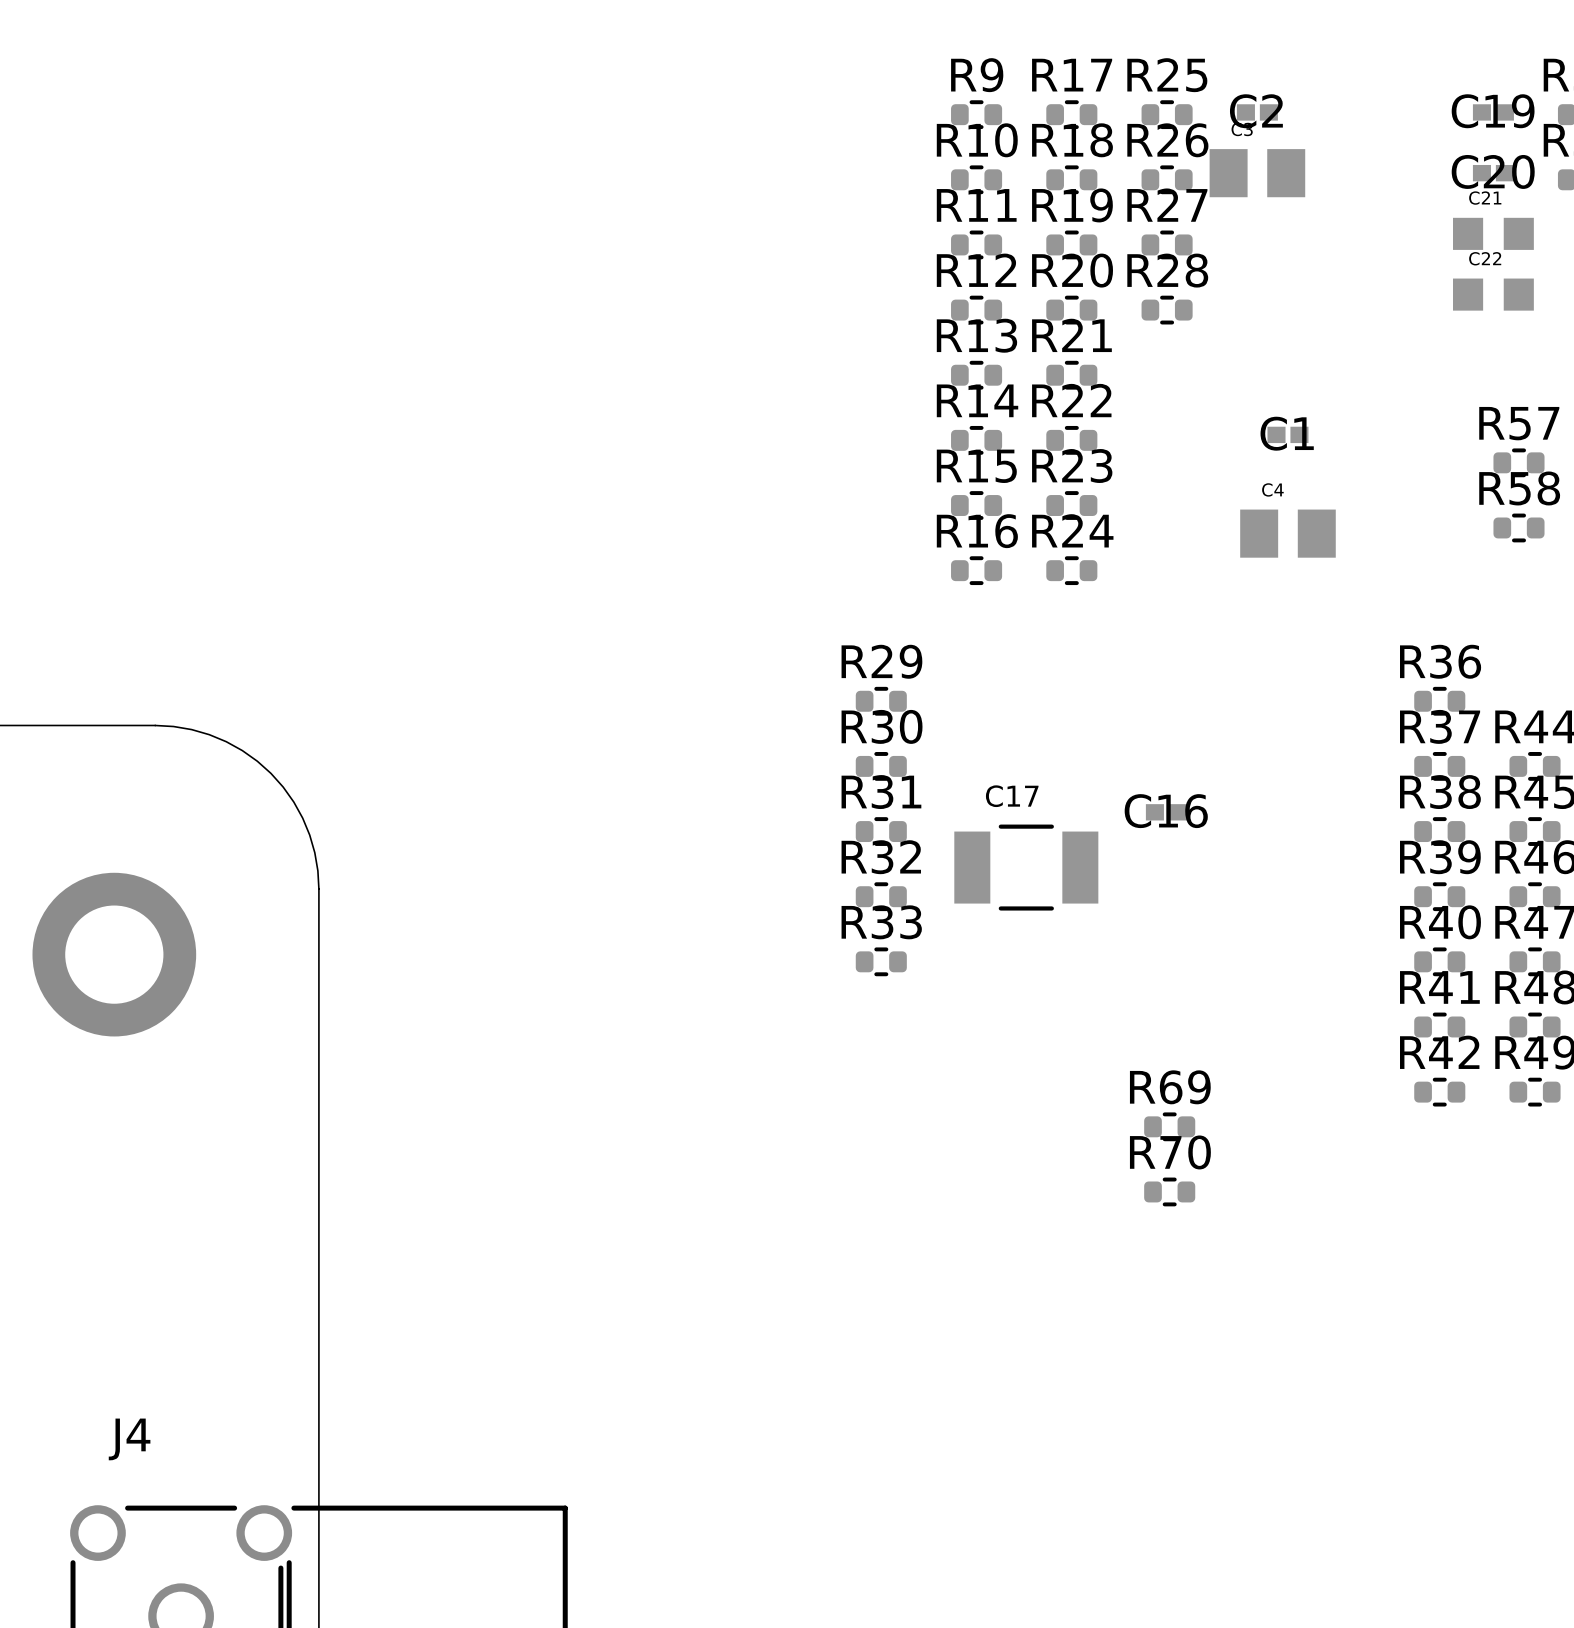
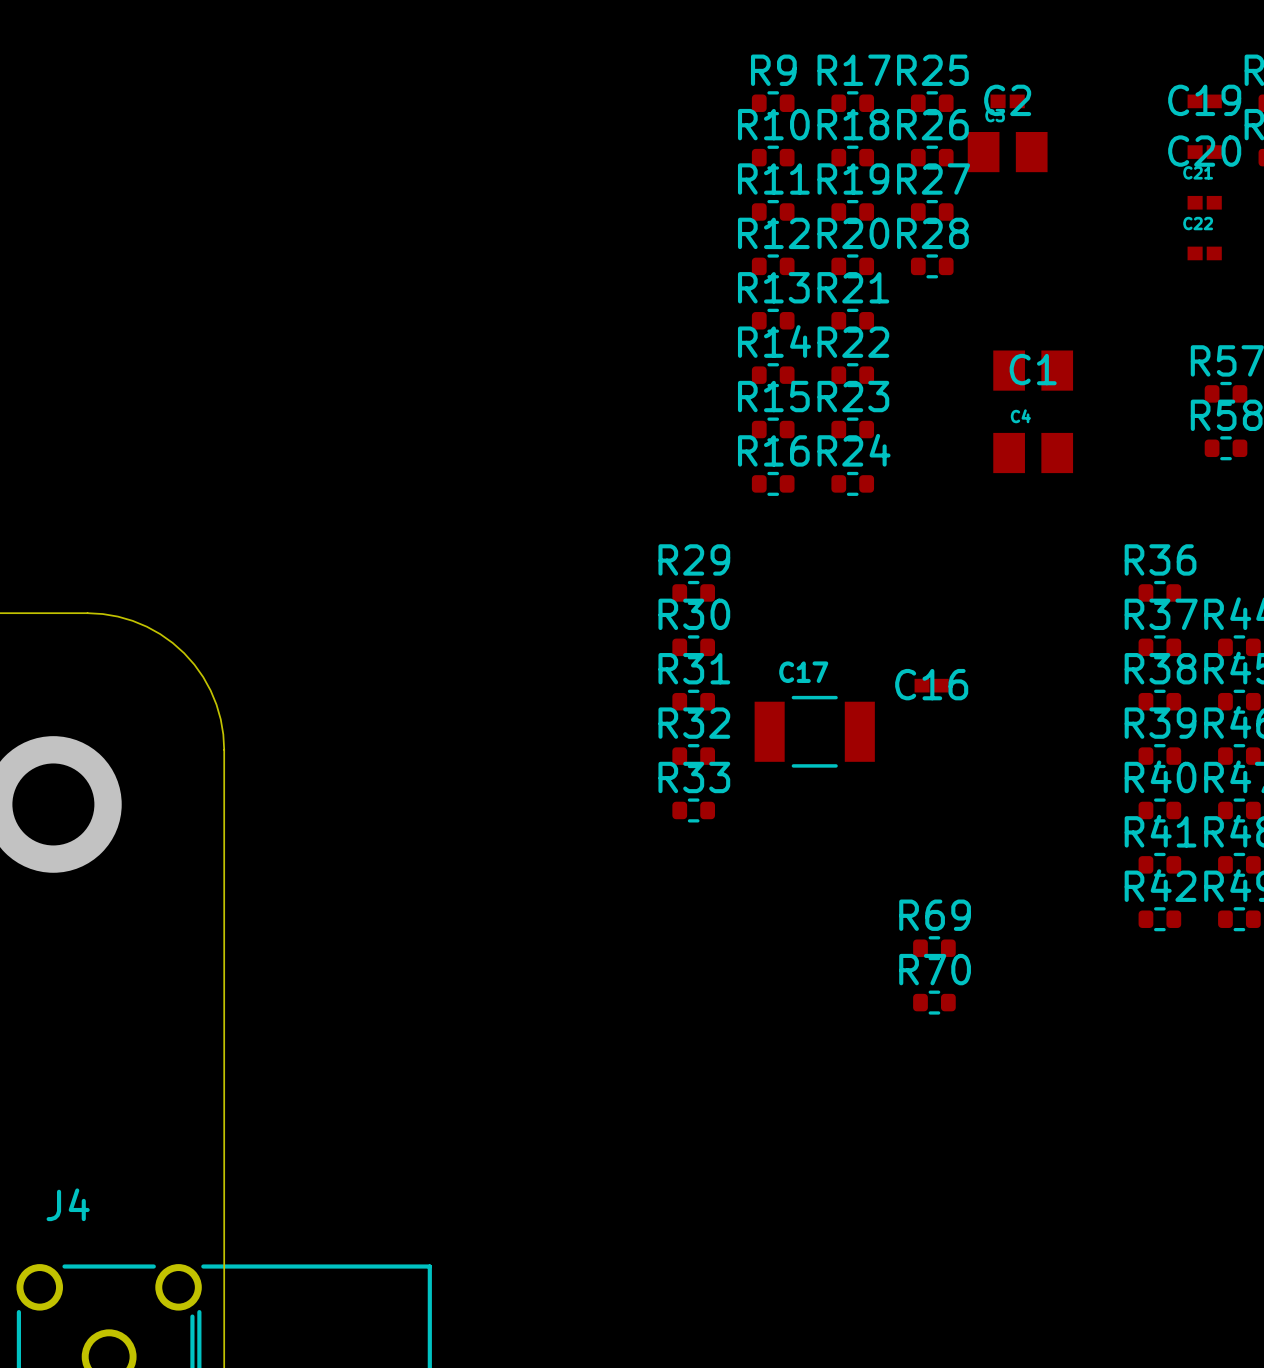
C21 footprint: [1453, 217, 1534, 250] -> [1187, 195, 1222, 210]
C22 footprint: [1453, 278, 1534, 311] -> [1187, 246, 1222, 261]
C1 footprint: [1267, 426, 1309, 444] -> [993, 350, 1074, 391]

